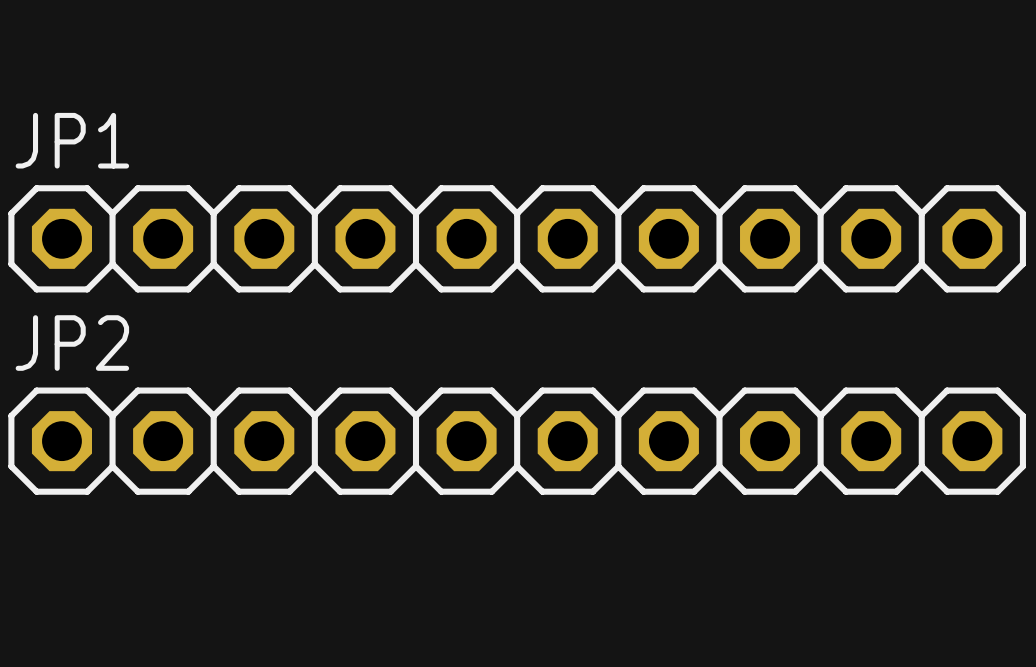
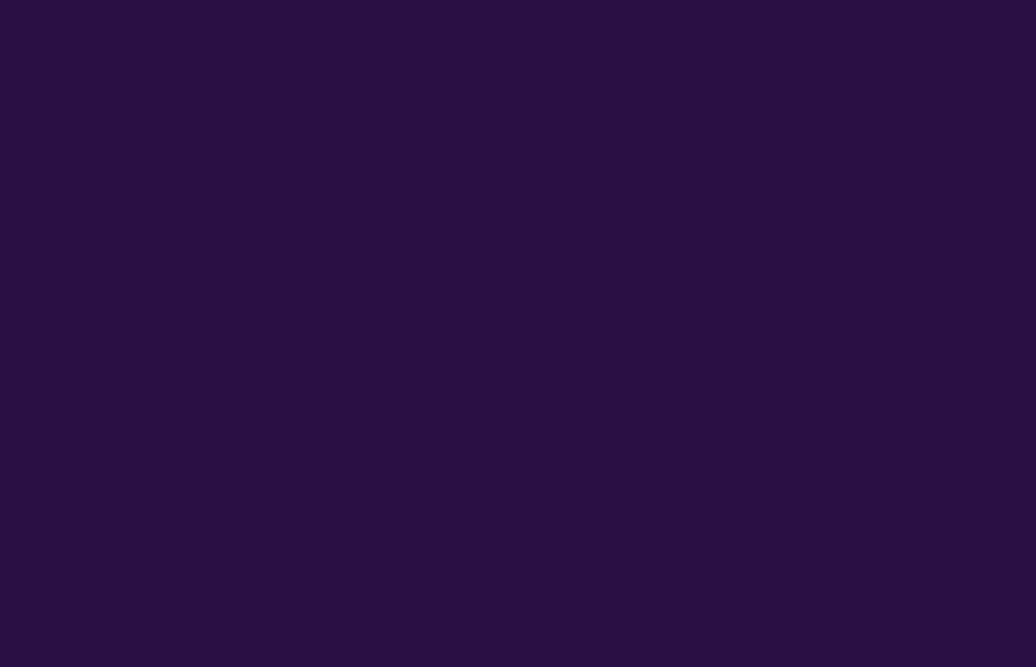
JP1: (517, 238) -> none
JP2: (517, 441) -> none

